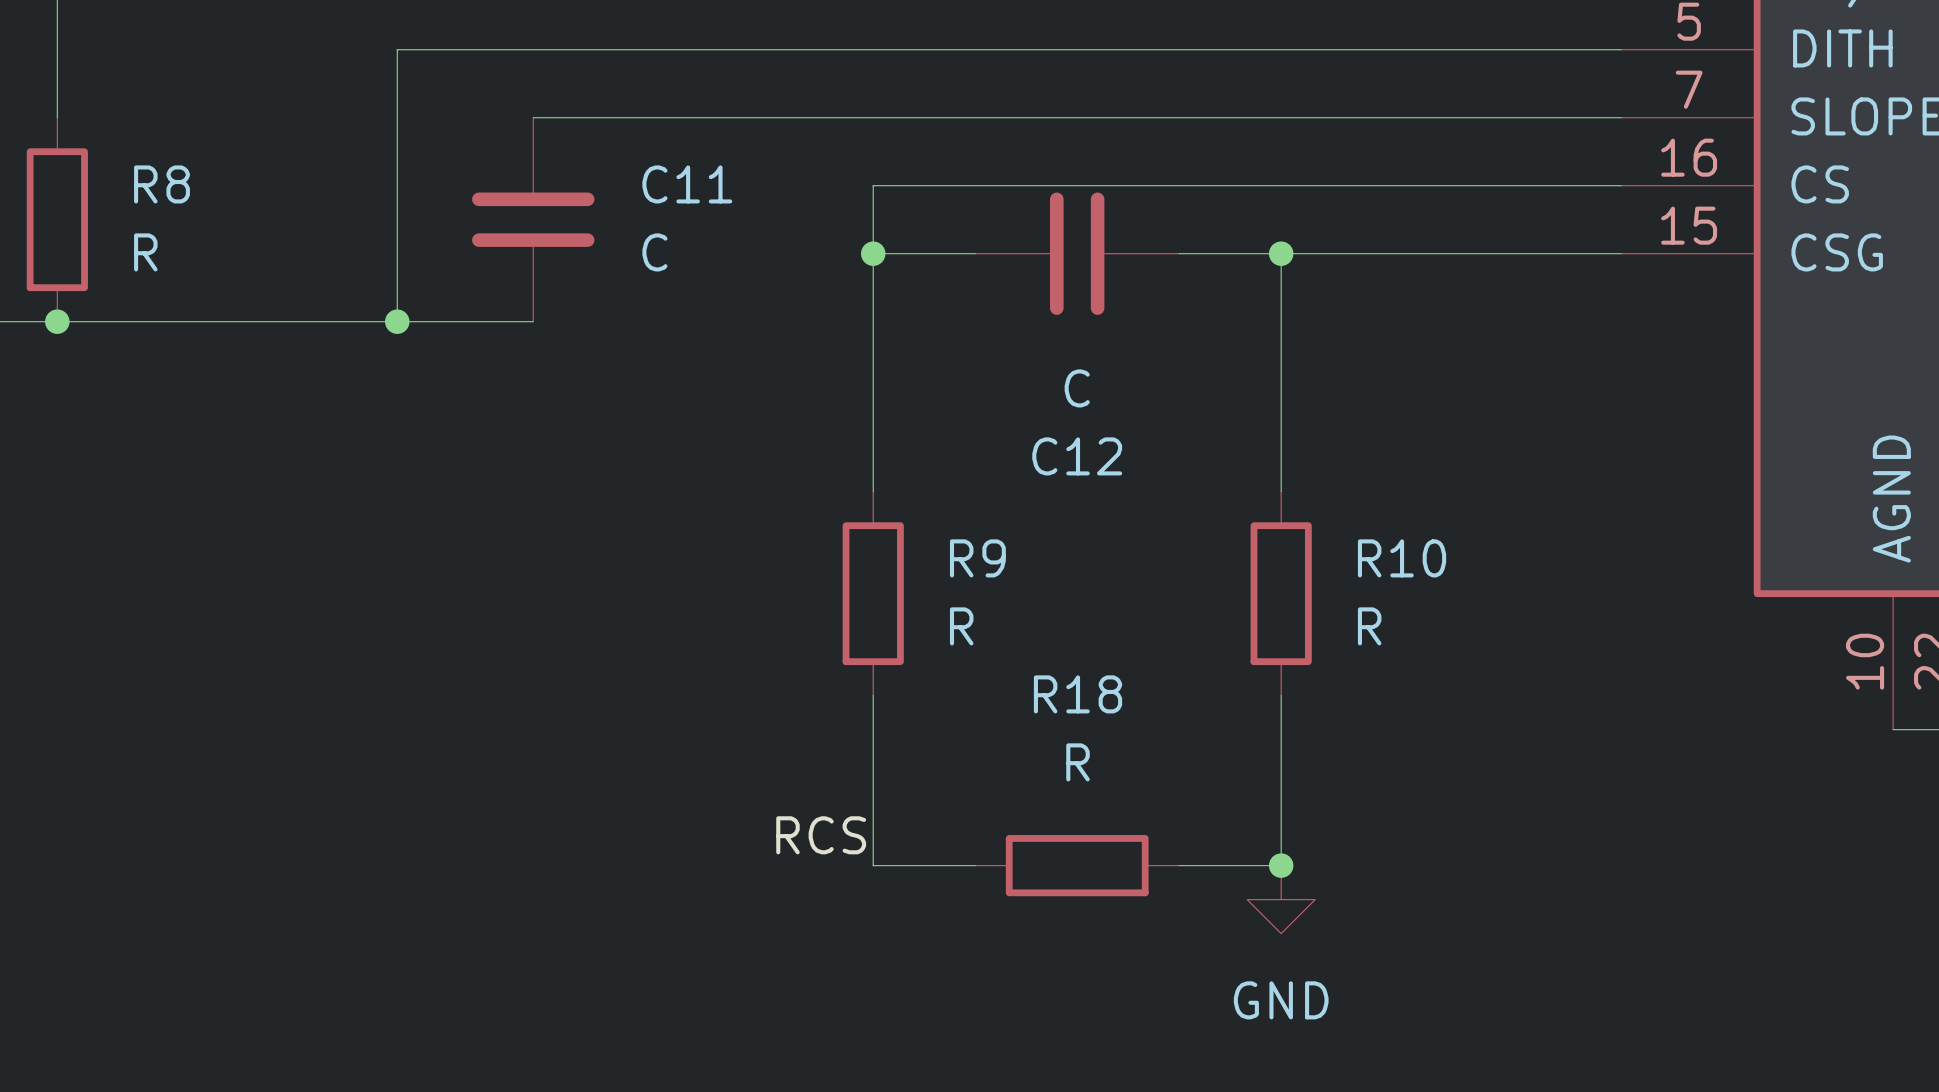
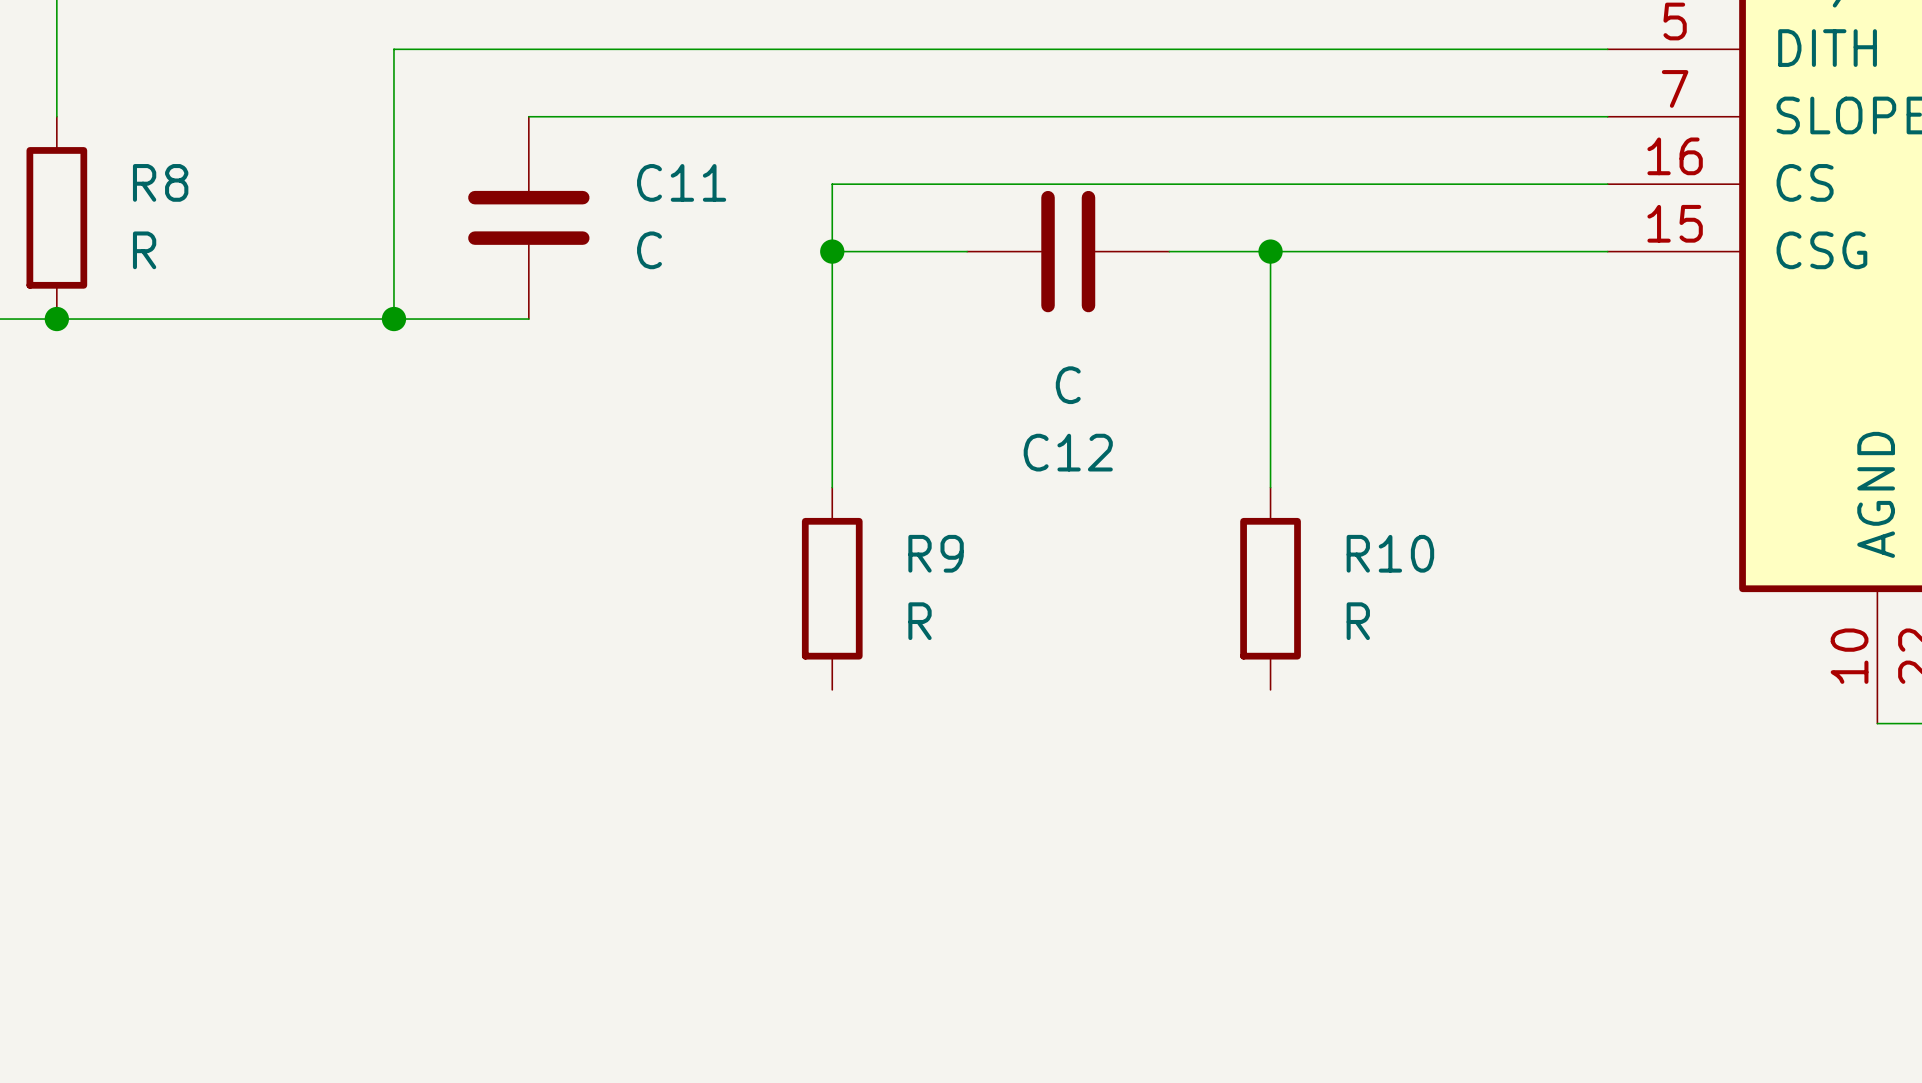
wire: (873, 185) (873, 491) -> (865, 184) (832, 184) (832, 487)
wire: none -> (832, 251) (865, 251)
junction position: (873, 253) -> (832, 251)
R9 position: (873, 593) -> (832, 588)
wire: (873, 695) (873, 865) (975, 865) -> none
wire: (1281, 695) (1281, 865) (1179, 865) -> none
label: RCS (821, 835) -> none
R18: R (1077, 865) -> none
junction: (1281, 865) -> none
power symbol: GND (1281, 899) -> none

